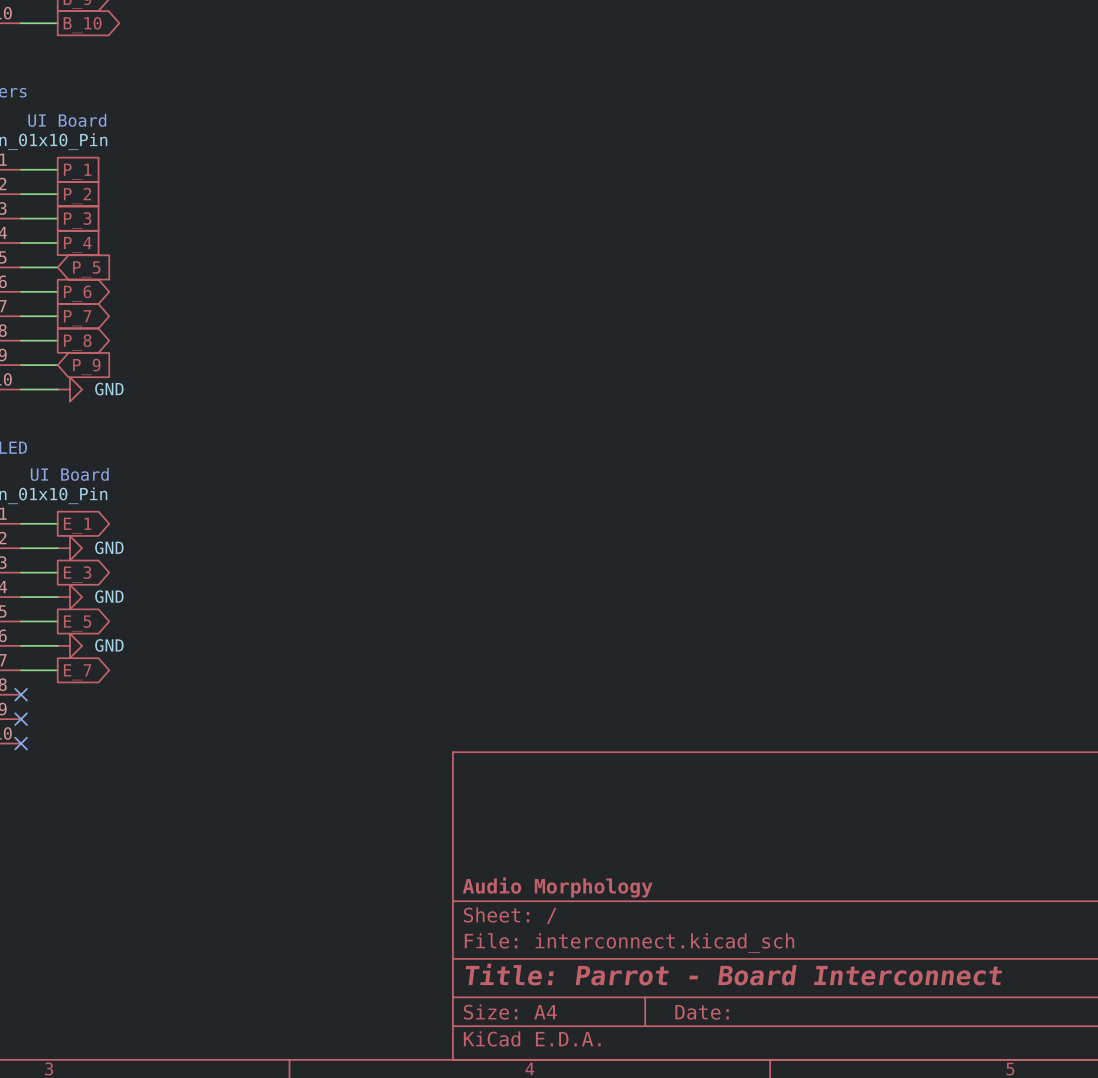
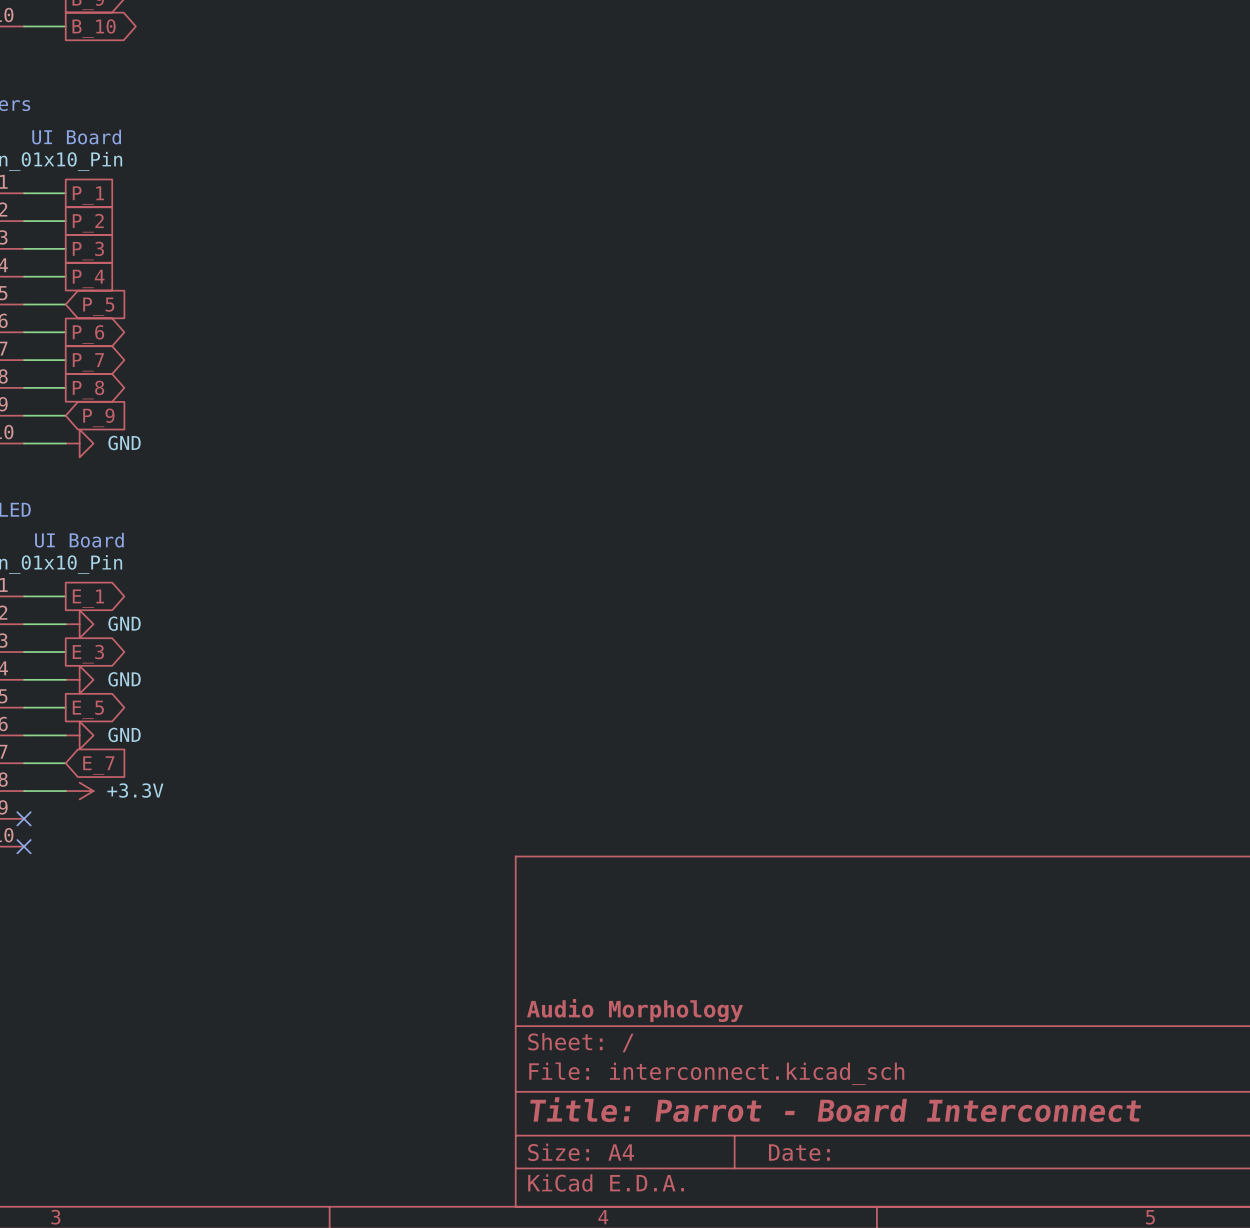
global label shape: output (77, 672) -> input (98, 765)
wire: none -> (24, 791) (65, 791)
no-connect mark: (21, 694) -> none
power symbol: none -> +3.3V (79, 791)

